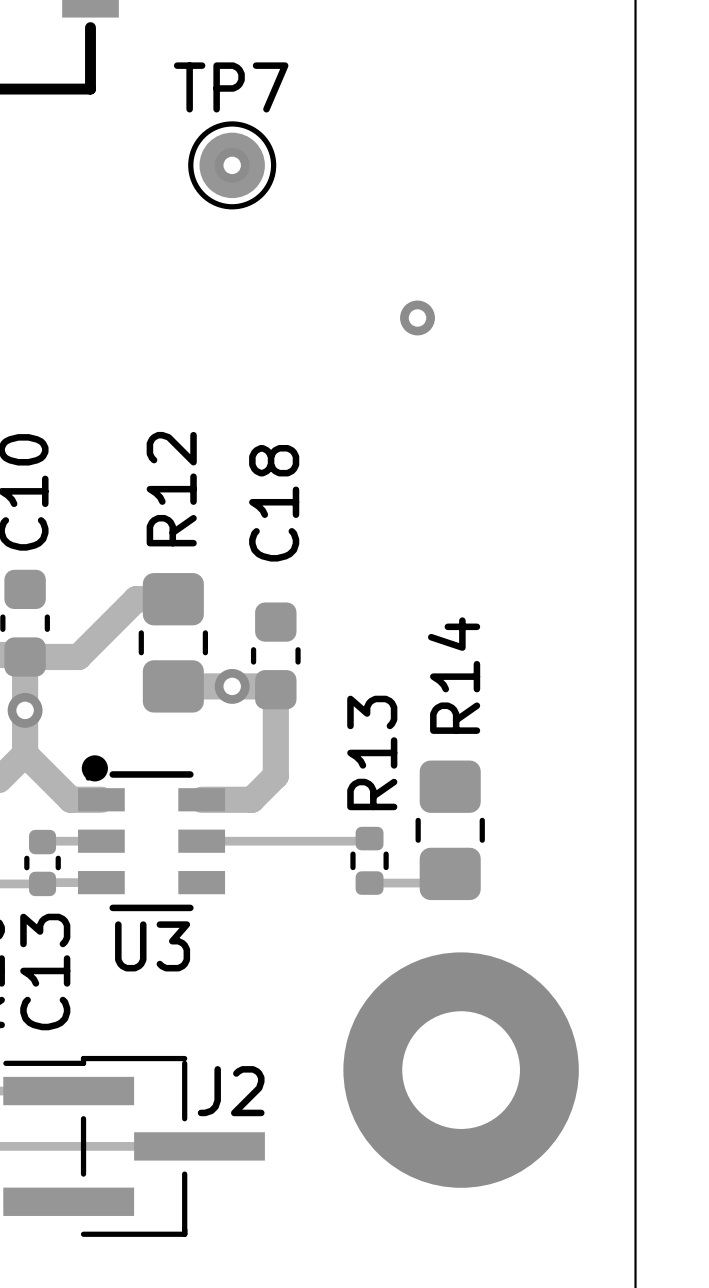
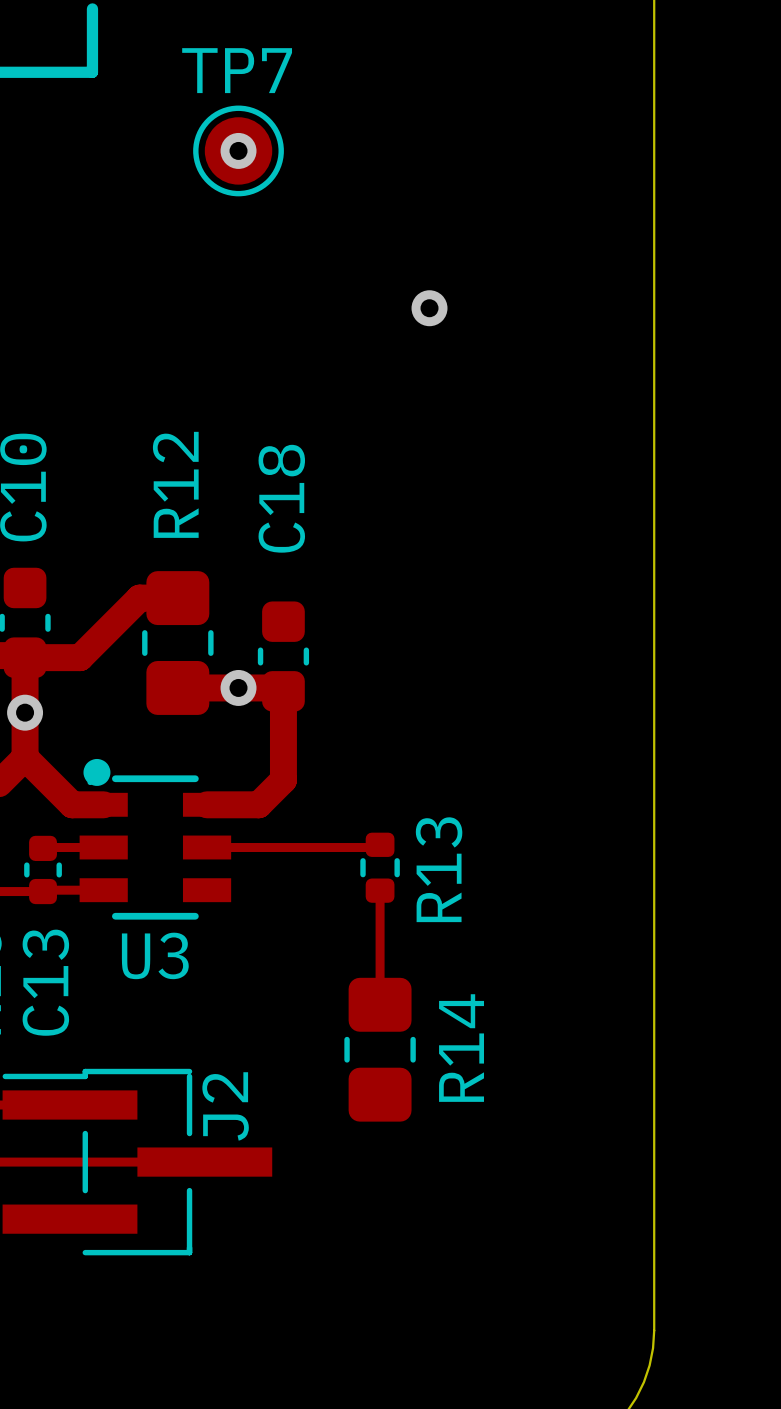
R14 name position: R14 (454, 675) -> R14 (461, 1048)
R13 name position: R13 (372, 752) -> R13 (439, 869)
R14 position: (450, 830) -> (380, 1049)
track: (369, 883) (441, 883) -> (380, 890) (380, 1004)
part: (461, 1070) -> none
J2 name rotation: 0° (231, 1091) -> 90° counterclockwise (225, 1106)

